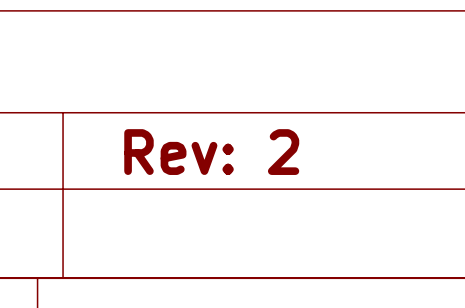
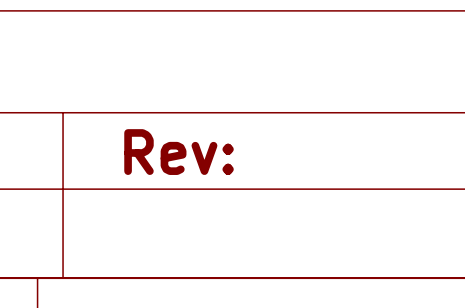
title block: Rev: 2 (211, 152) -> Rev: (179, 152)

